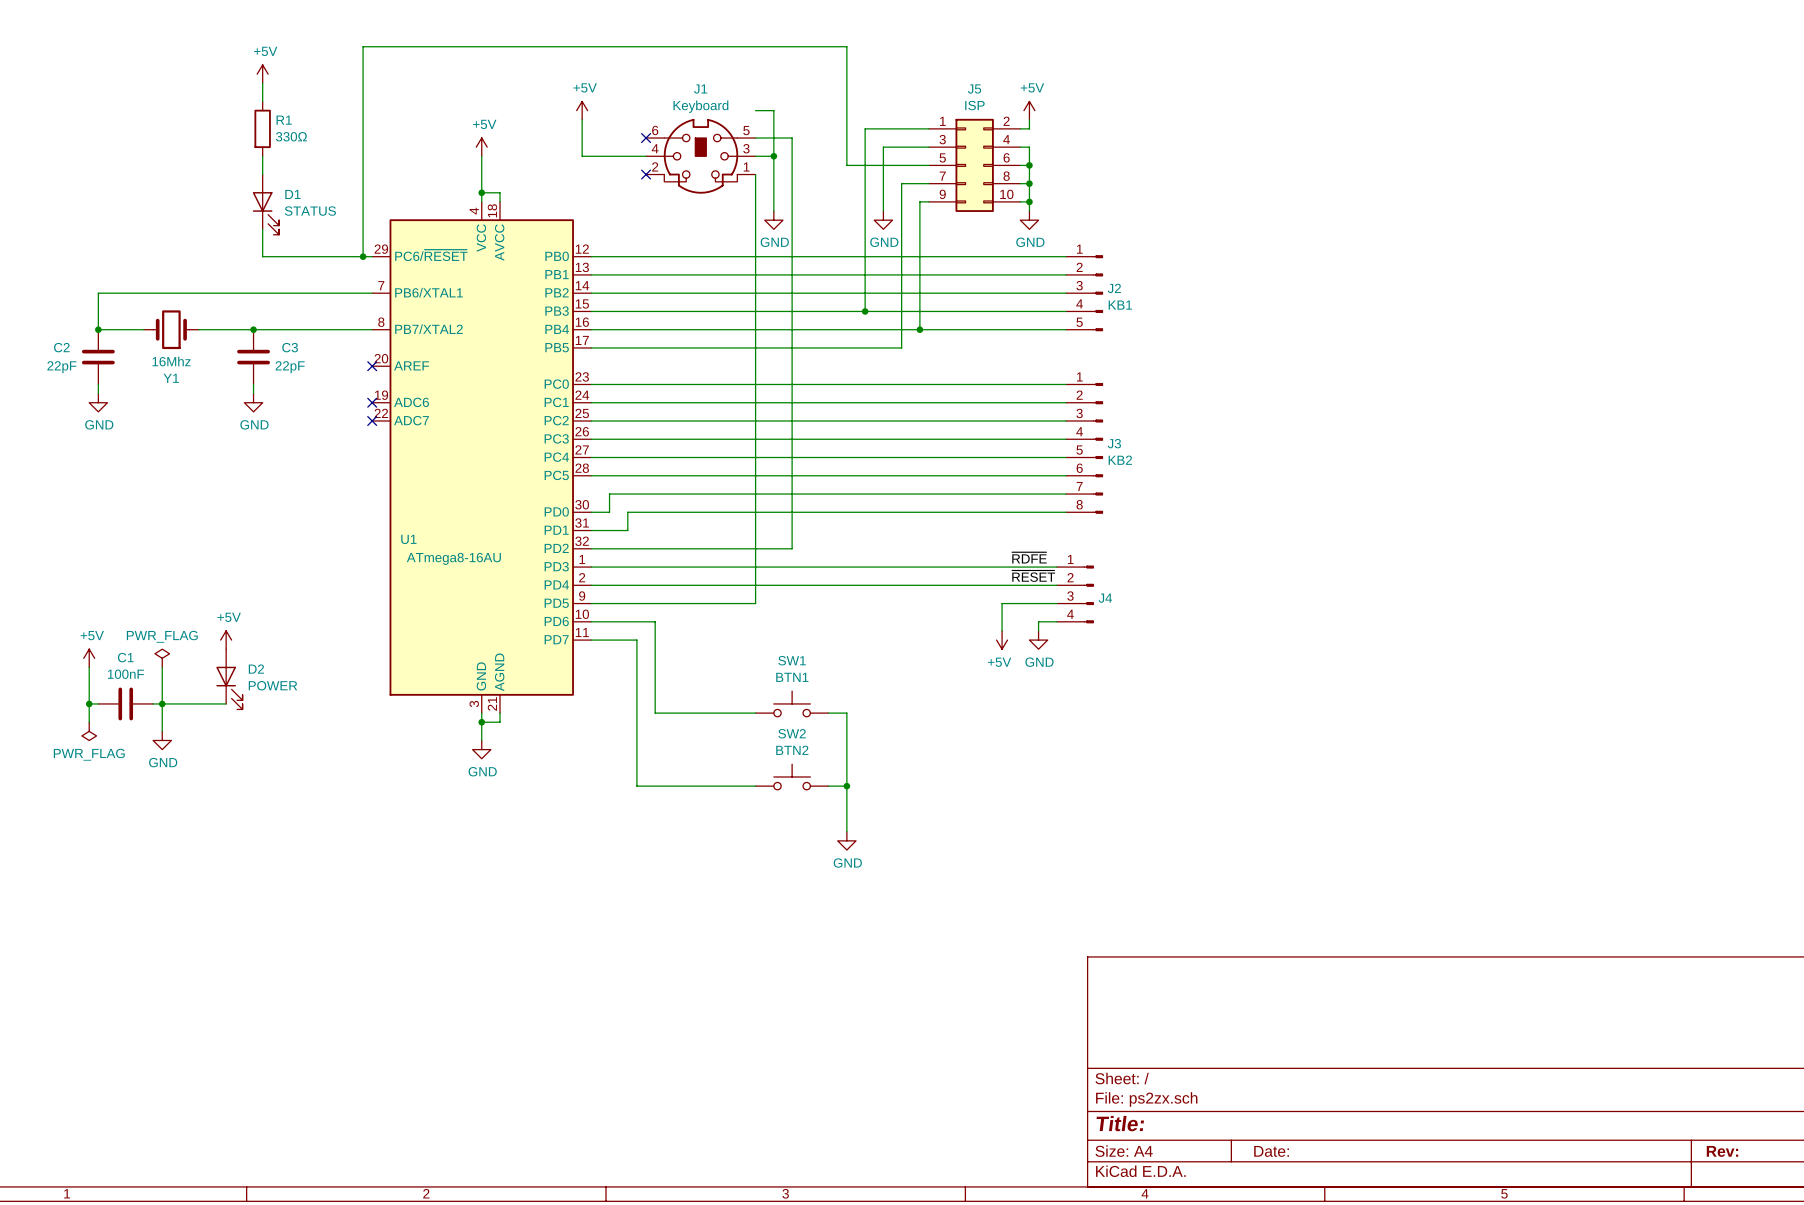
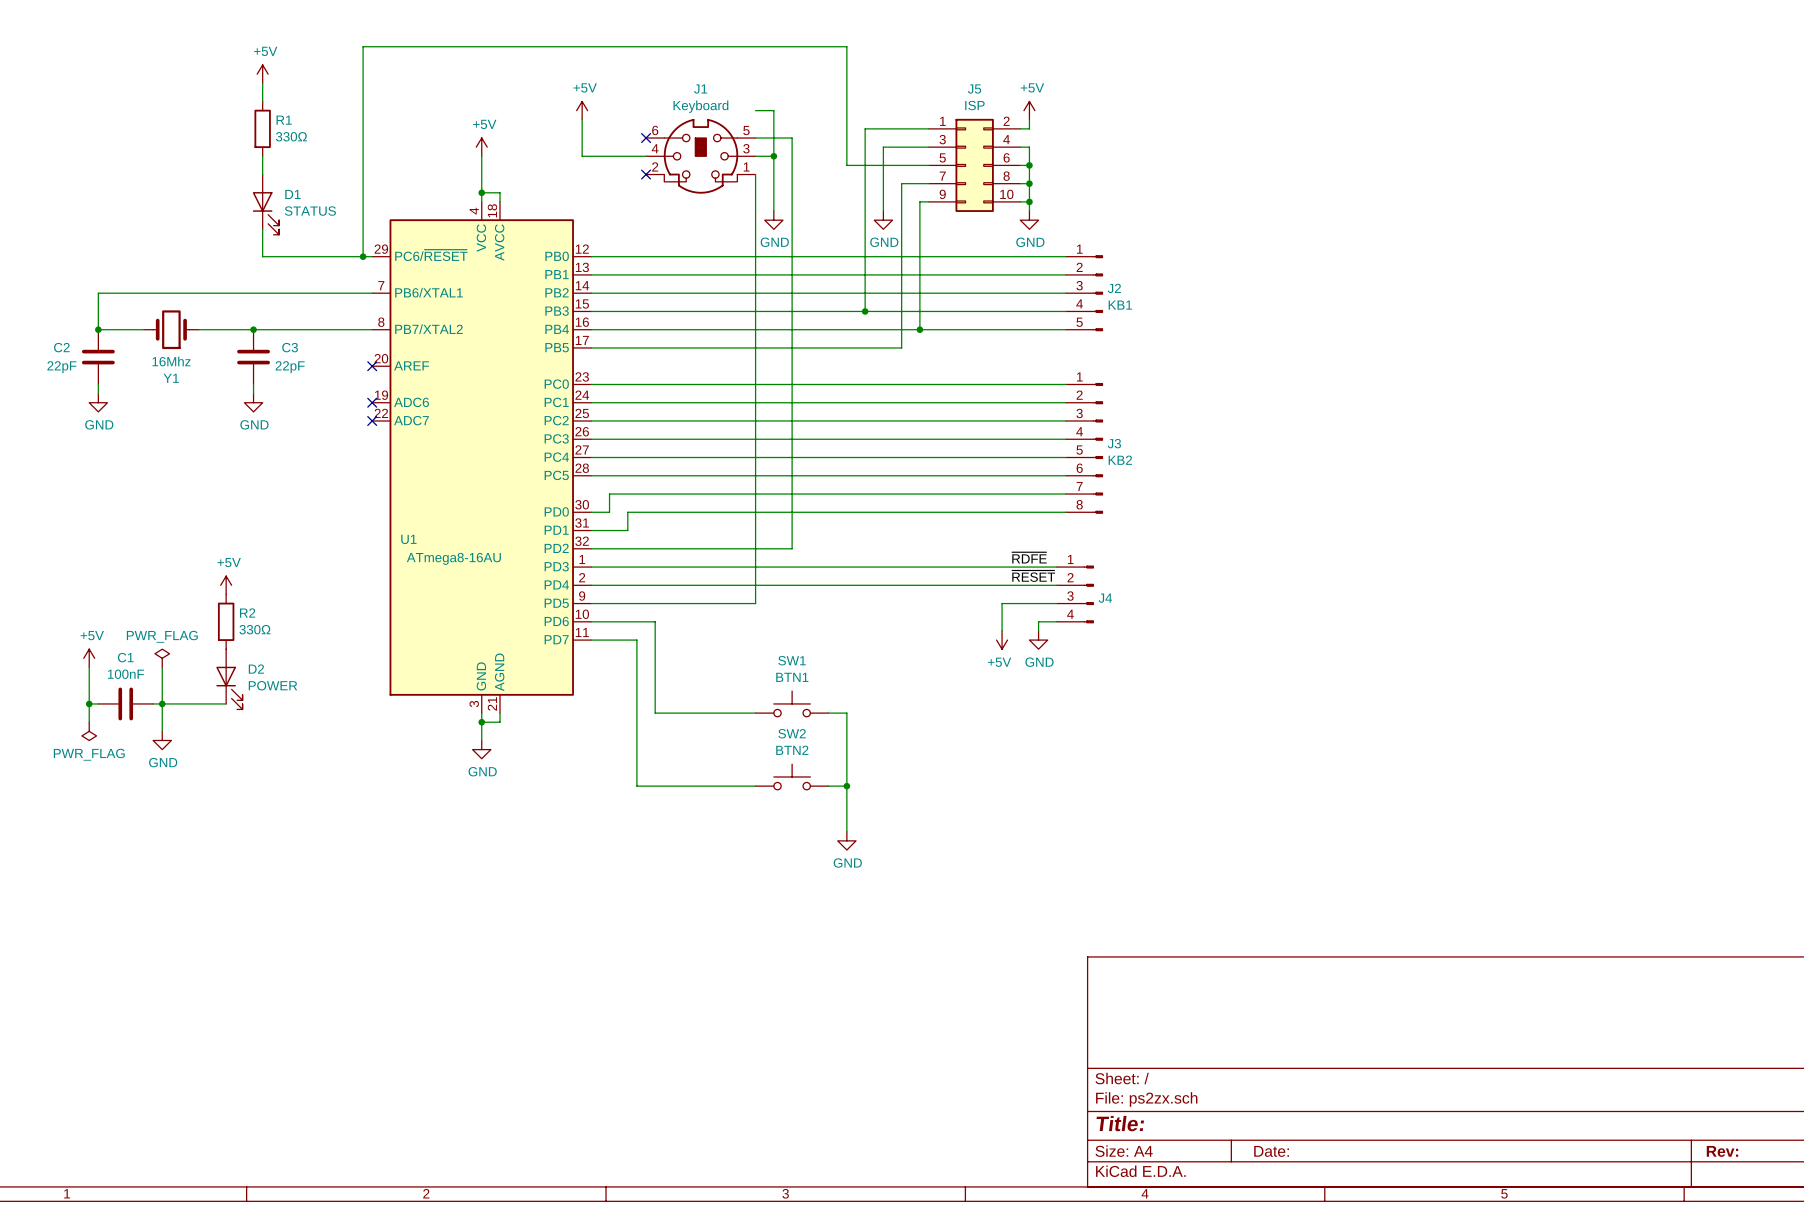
R2: none -> 330Ω (226, 621)
power symbol position: +5V (226, 640) -> +5V (226, 585)

